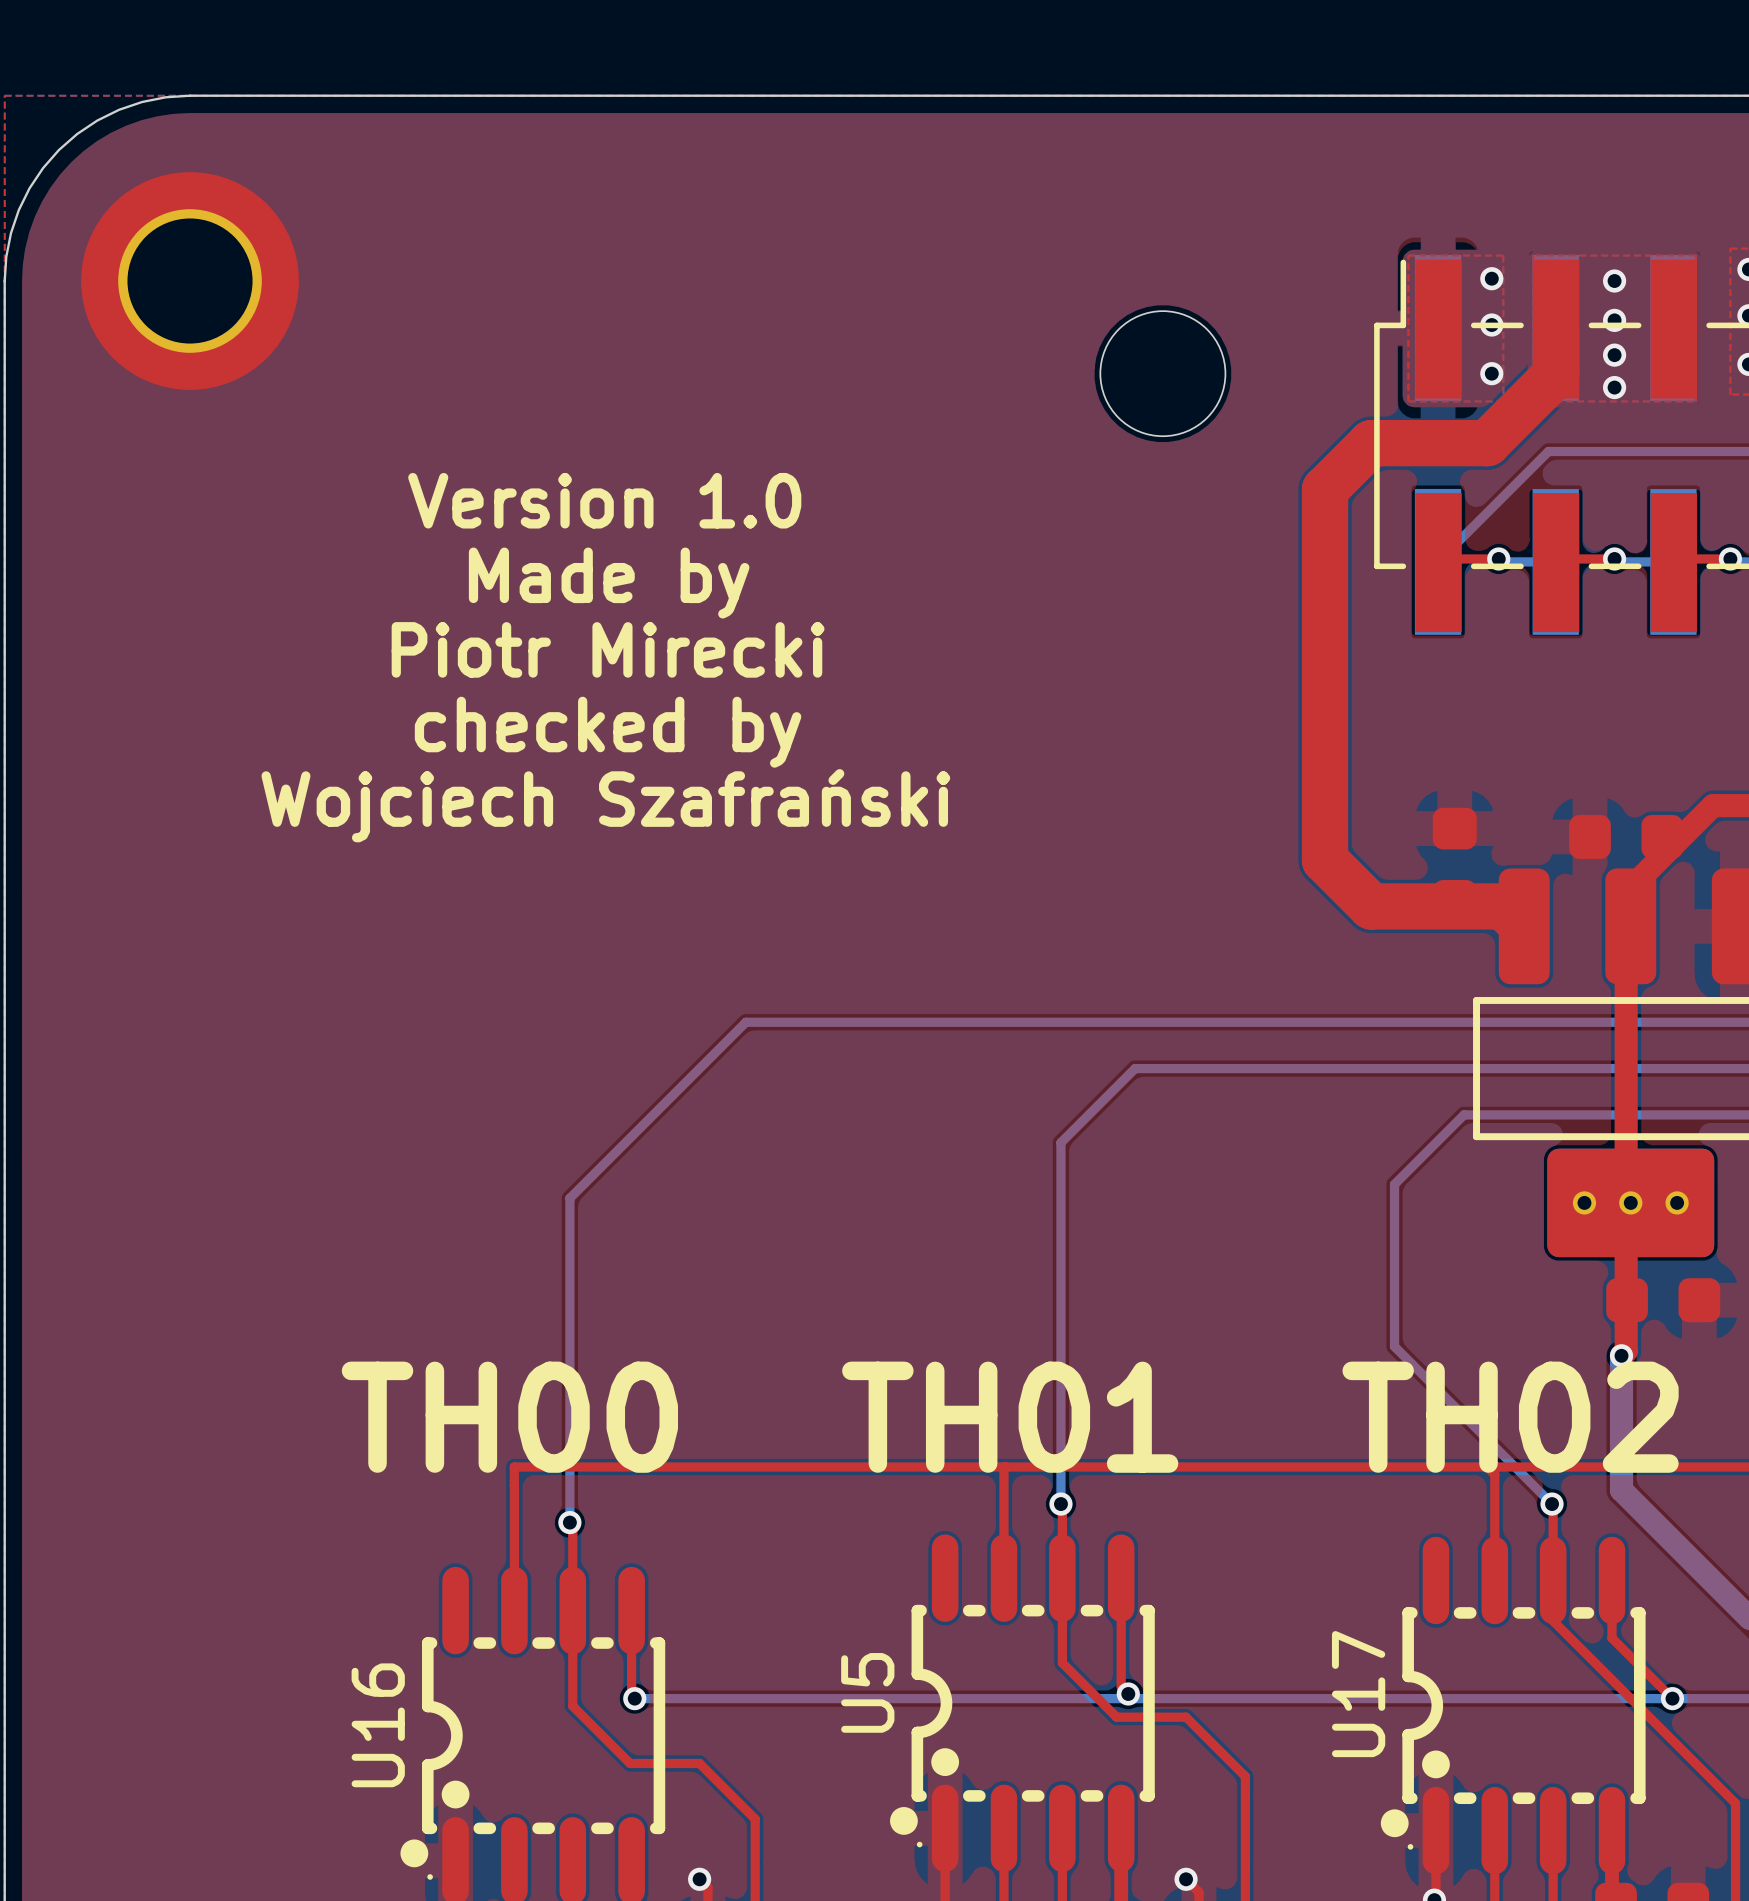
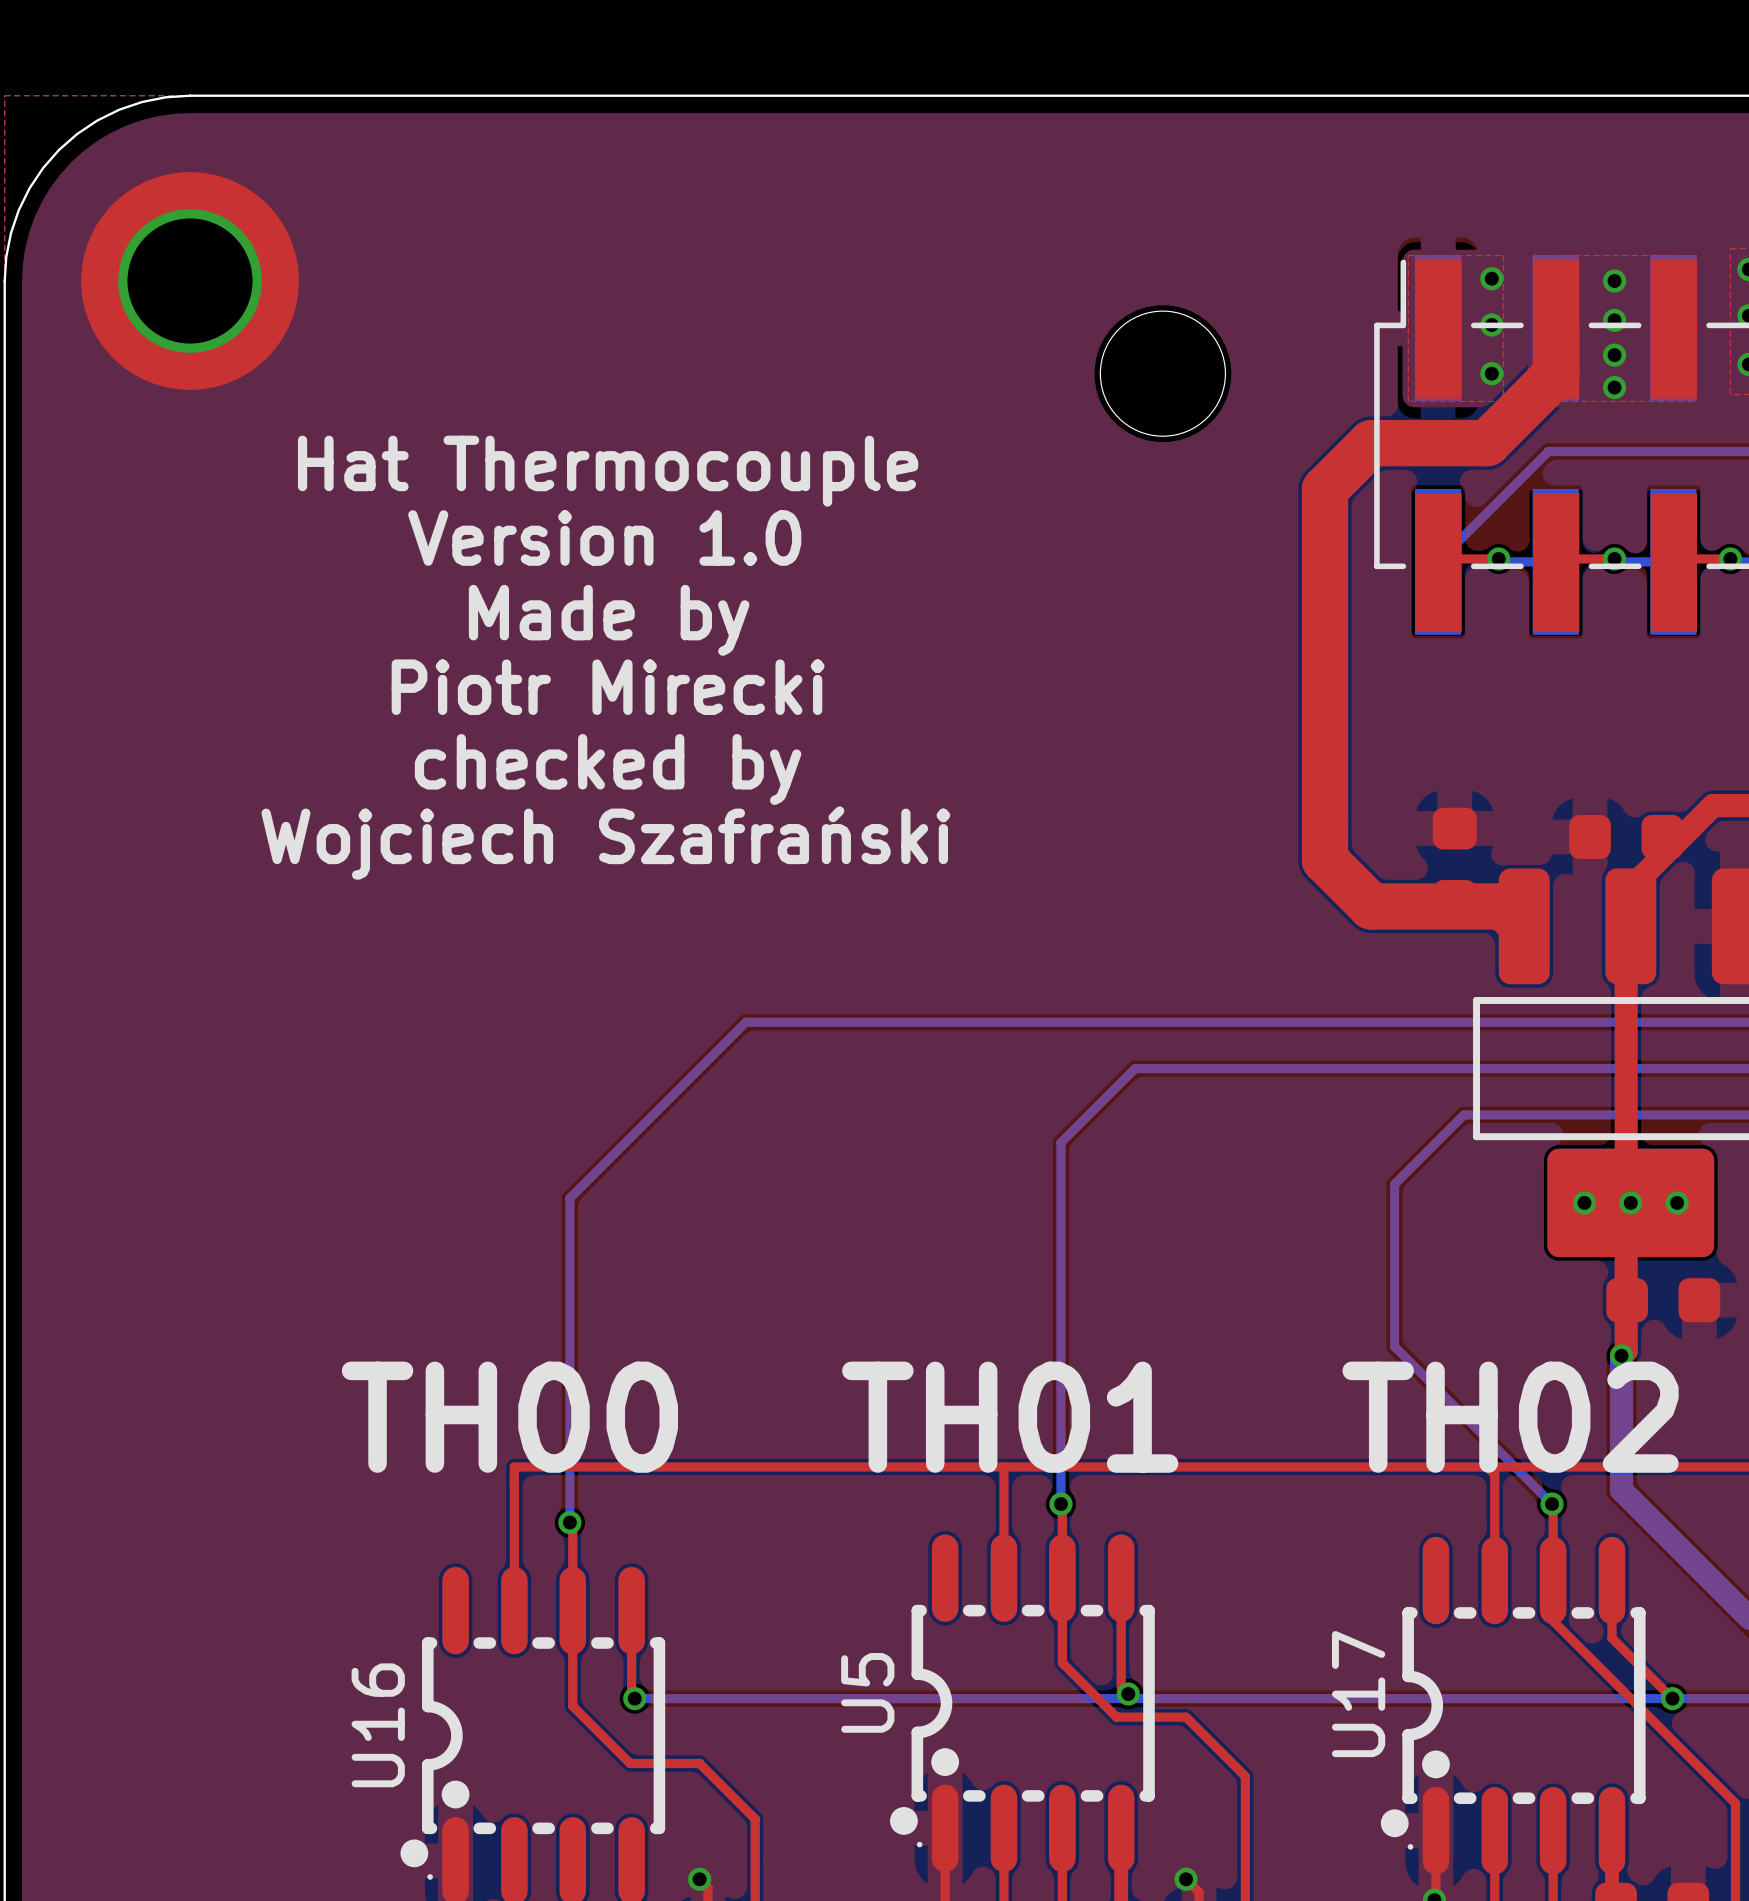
text: none -> Hat Thermocouple (608, 471)
text position: Version 1.0 (604, 500) -> Version 1.0 (604, 538)
text position: Made by (609, 583) -> Made by (609, 620)
text position: Piotr Mirecki (608, 649) -> Piotr Mirecki (608, 687)
text position: checked by (608, 732) -> checked by (608, 769)
text position: Wojciech Szafrański (605, 805) -> Wojciech Szafrański (605, 842)

